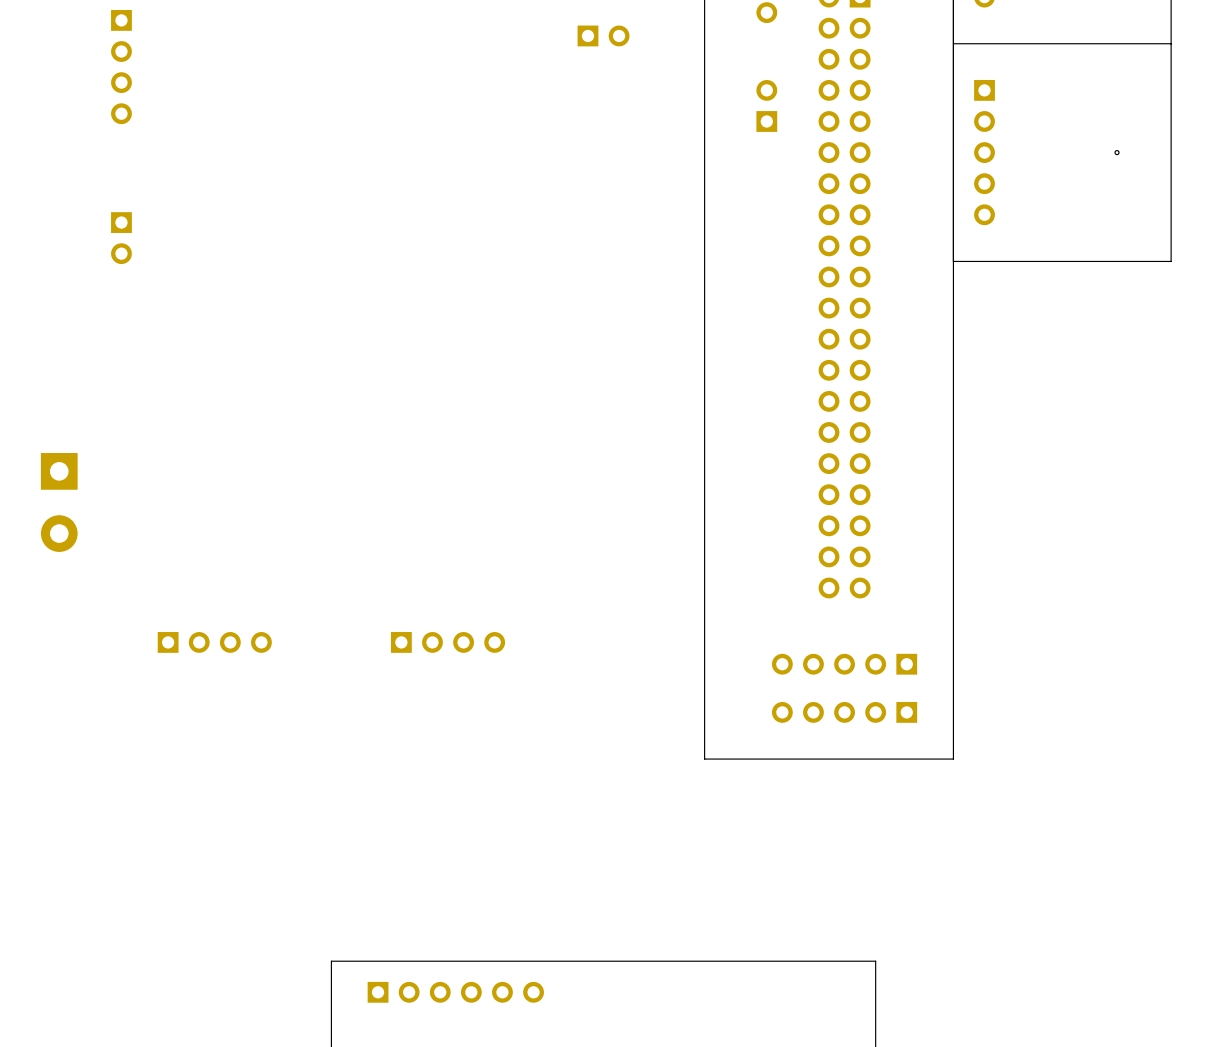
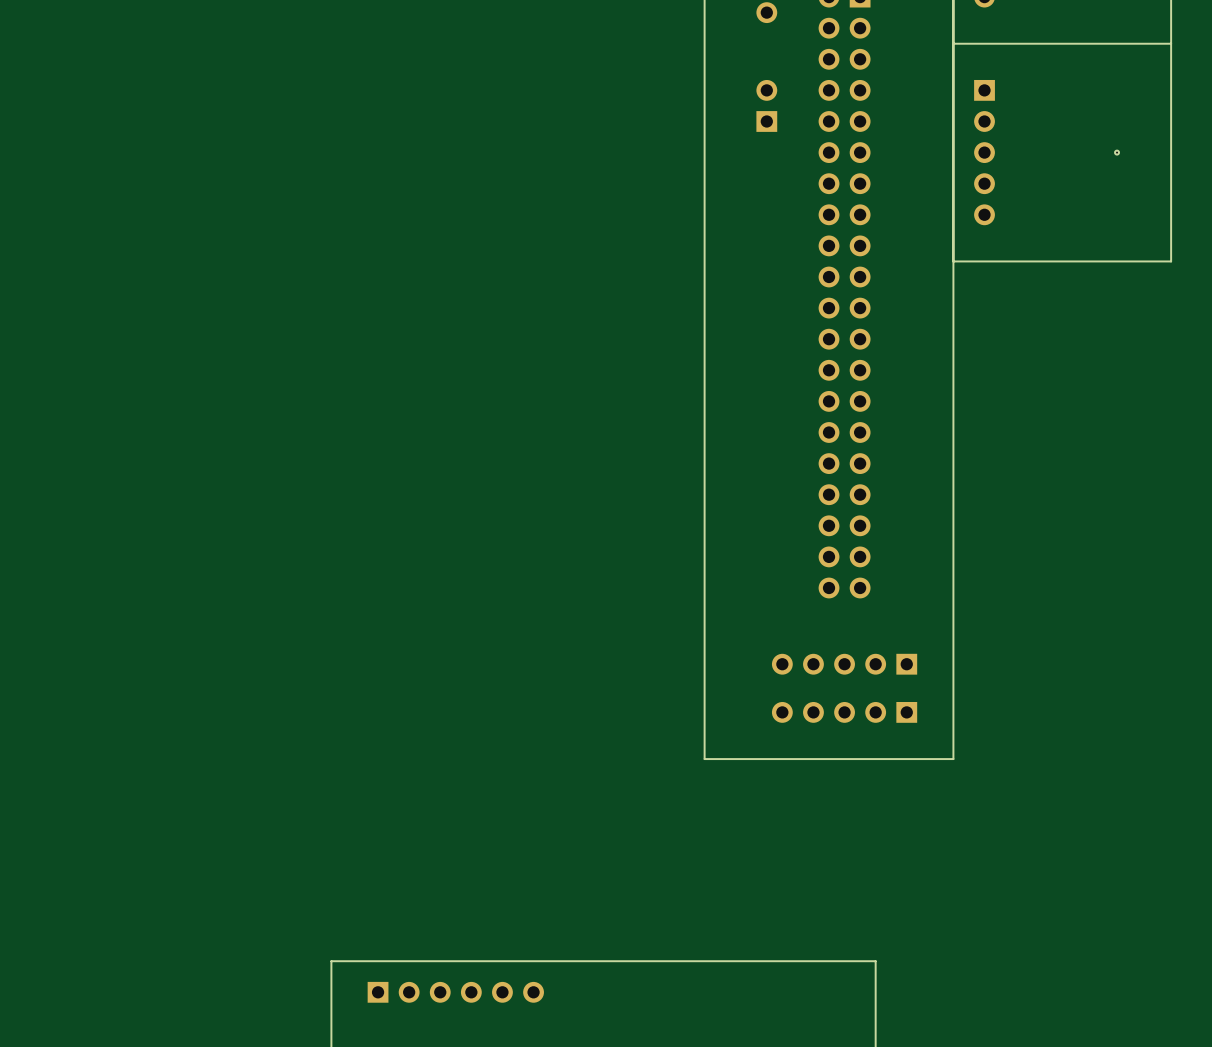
part: (603, 35) -> none
part: (121, 67) -> none
part: (121, 238) -> none
part: (59, 502) -> none
part: (214, 642) -> none
part: (448, 642) -> none

